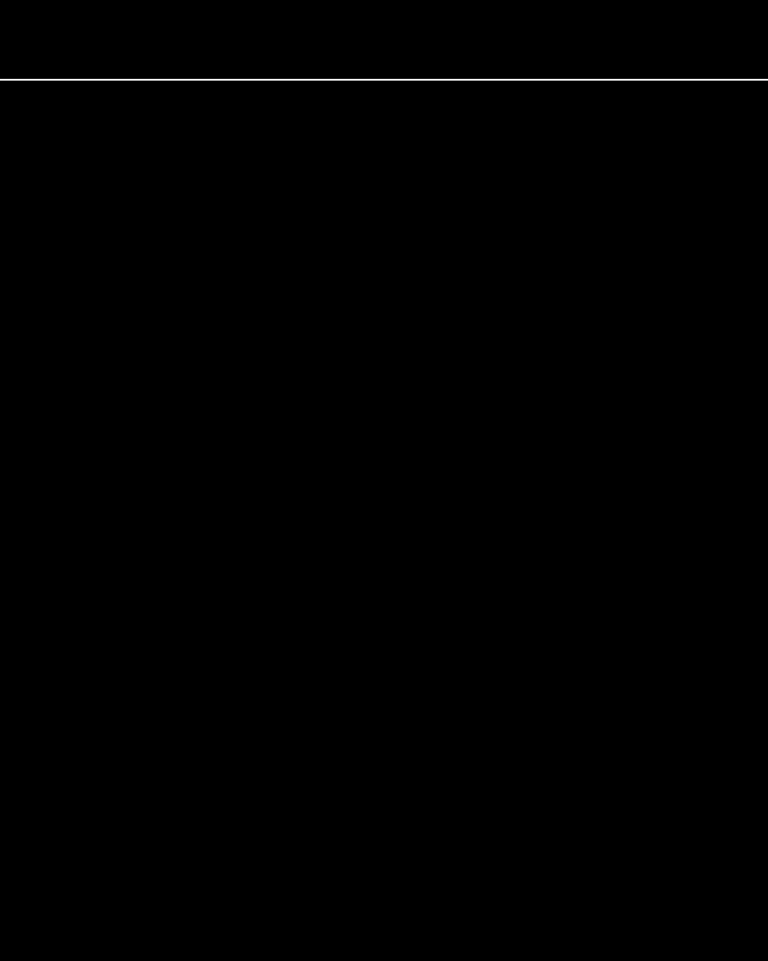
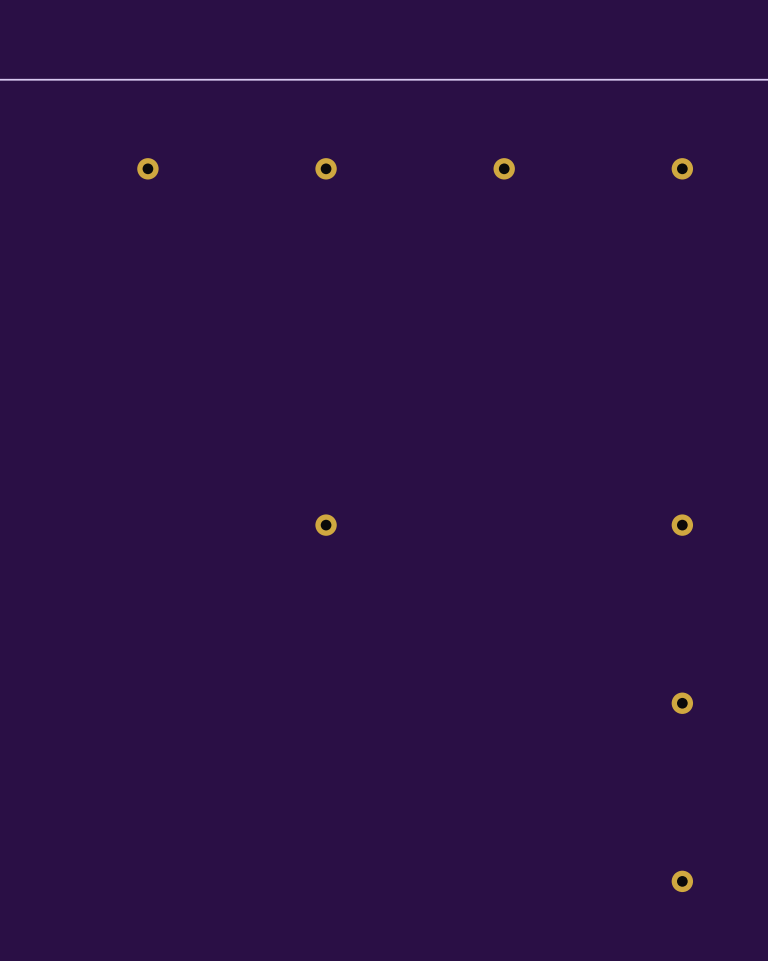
via: none -> (147, 168)
via: none -> (326, 168)
via: none -> (504, 168)
via: none -> (682, 168)
via: none -> (326, 525)
via: none -> (682, 525)
via: none -> (682, 703)
via: none -> (682, 881)

